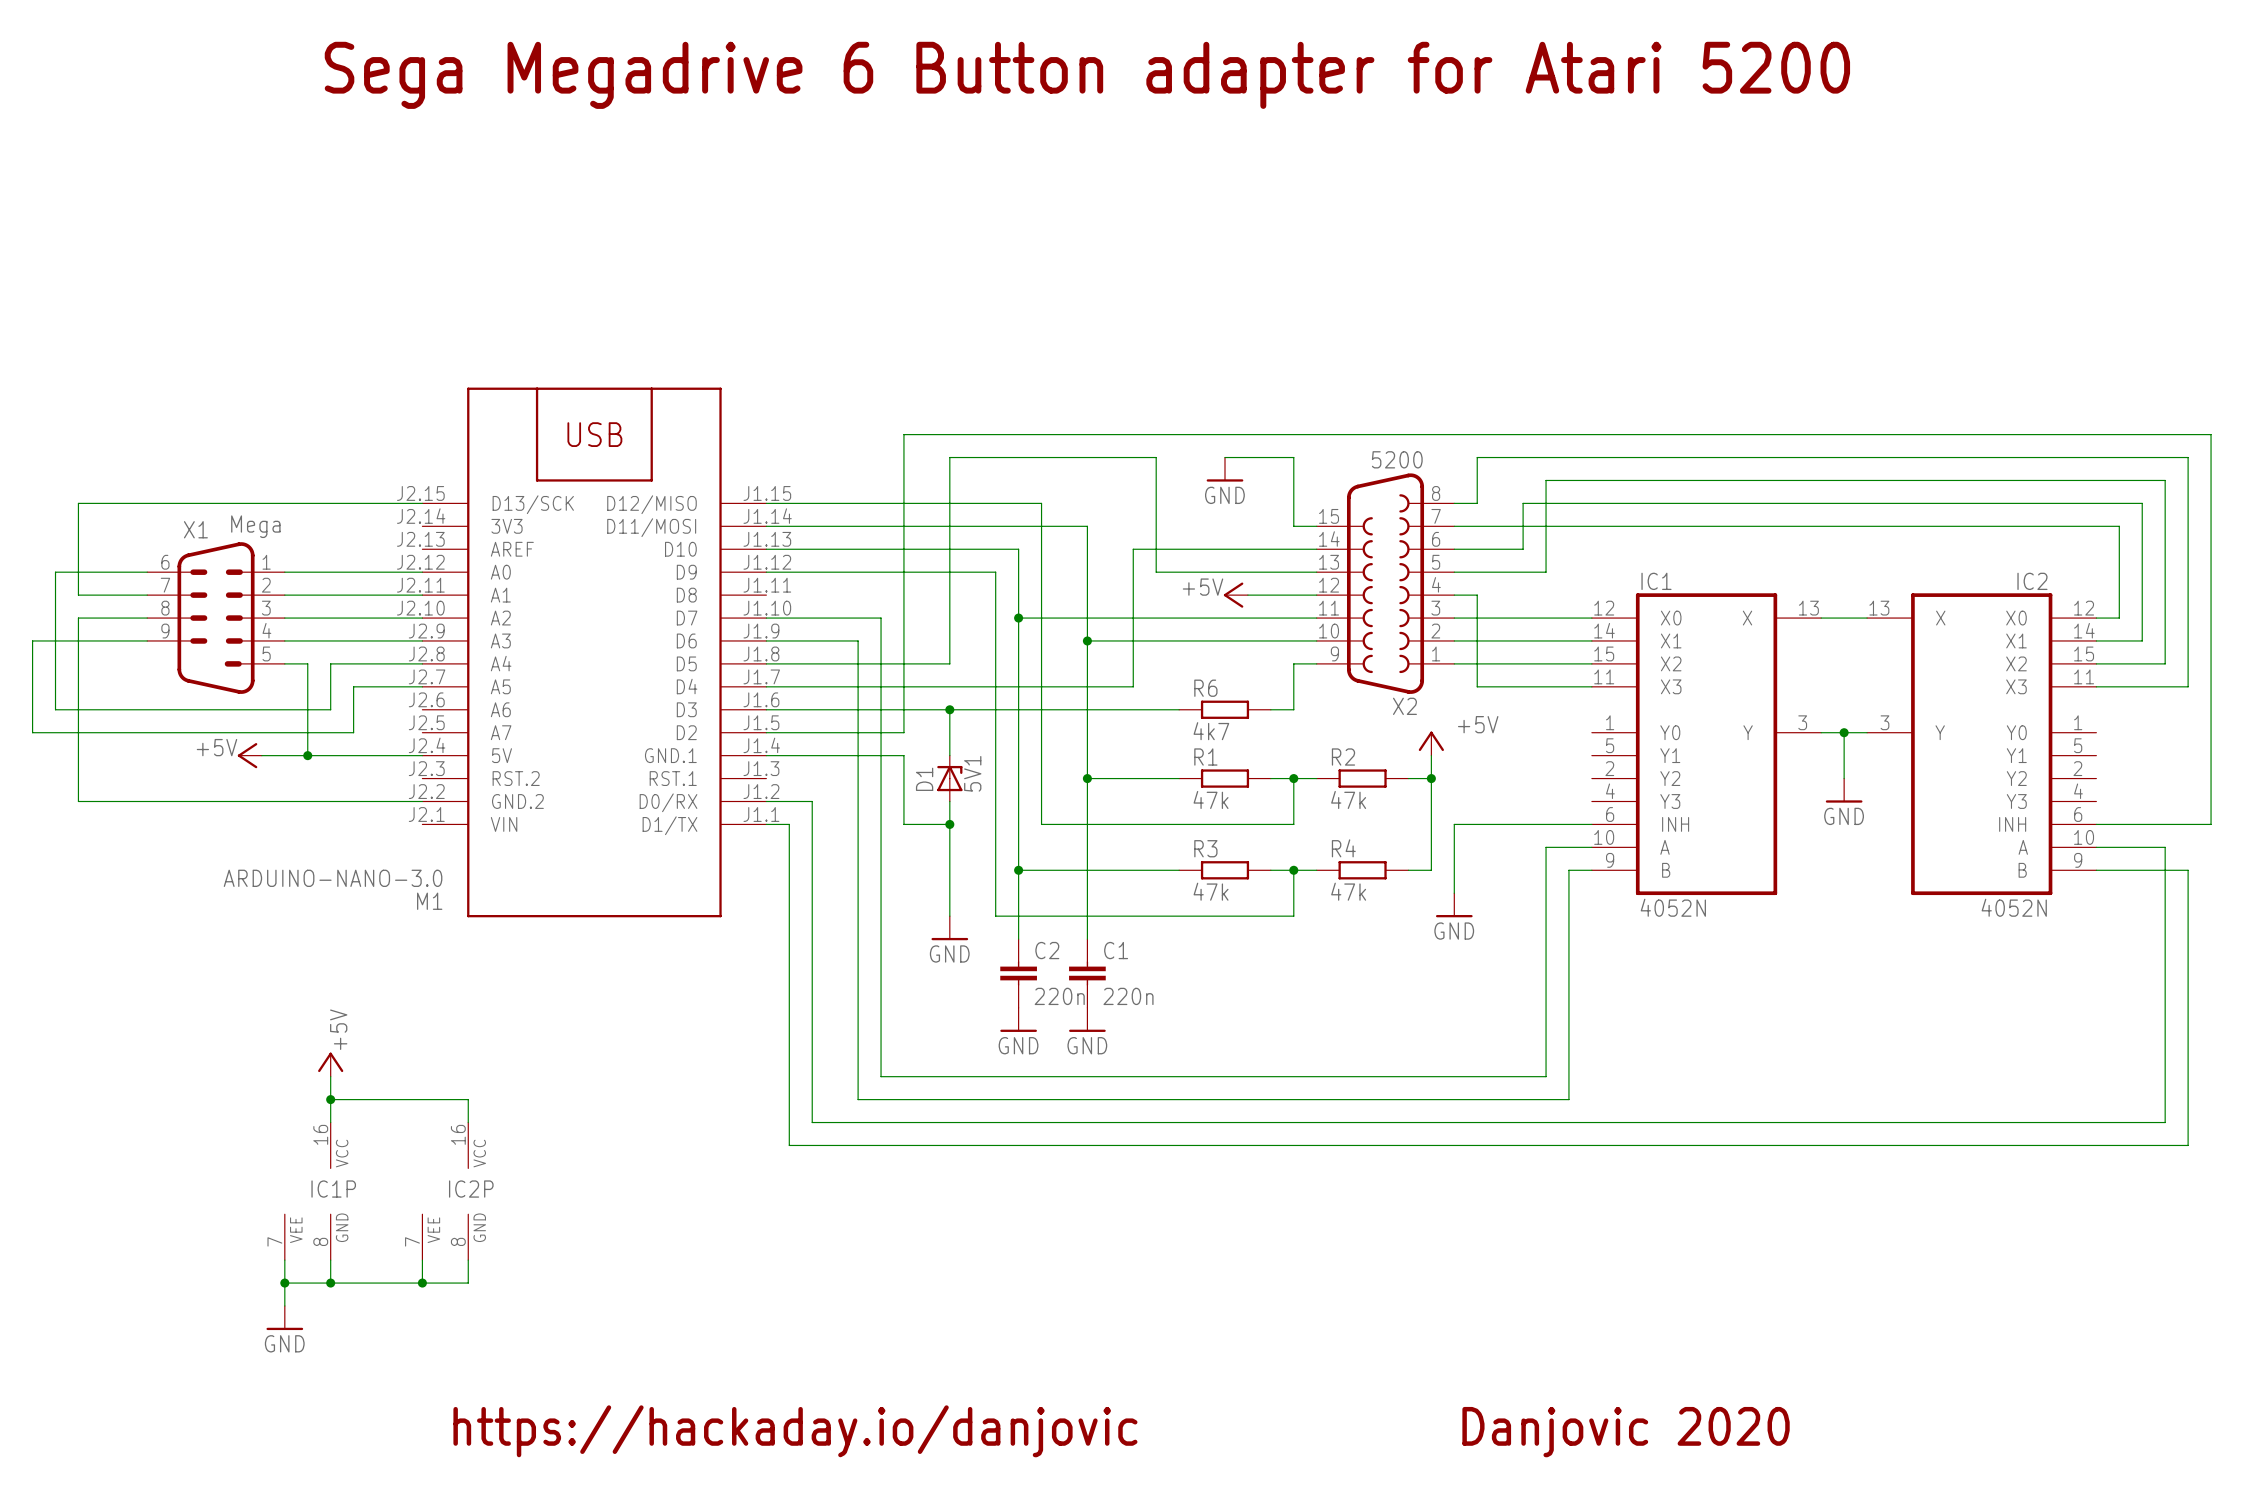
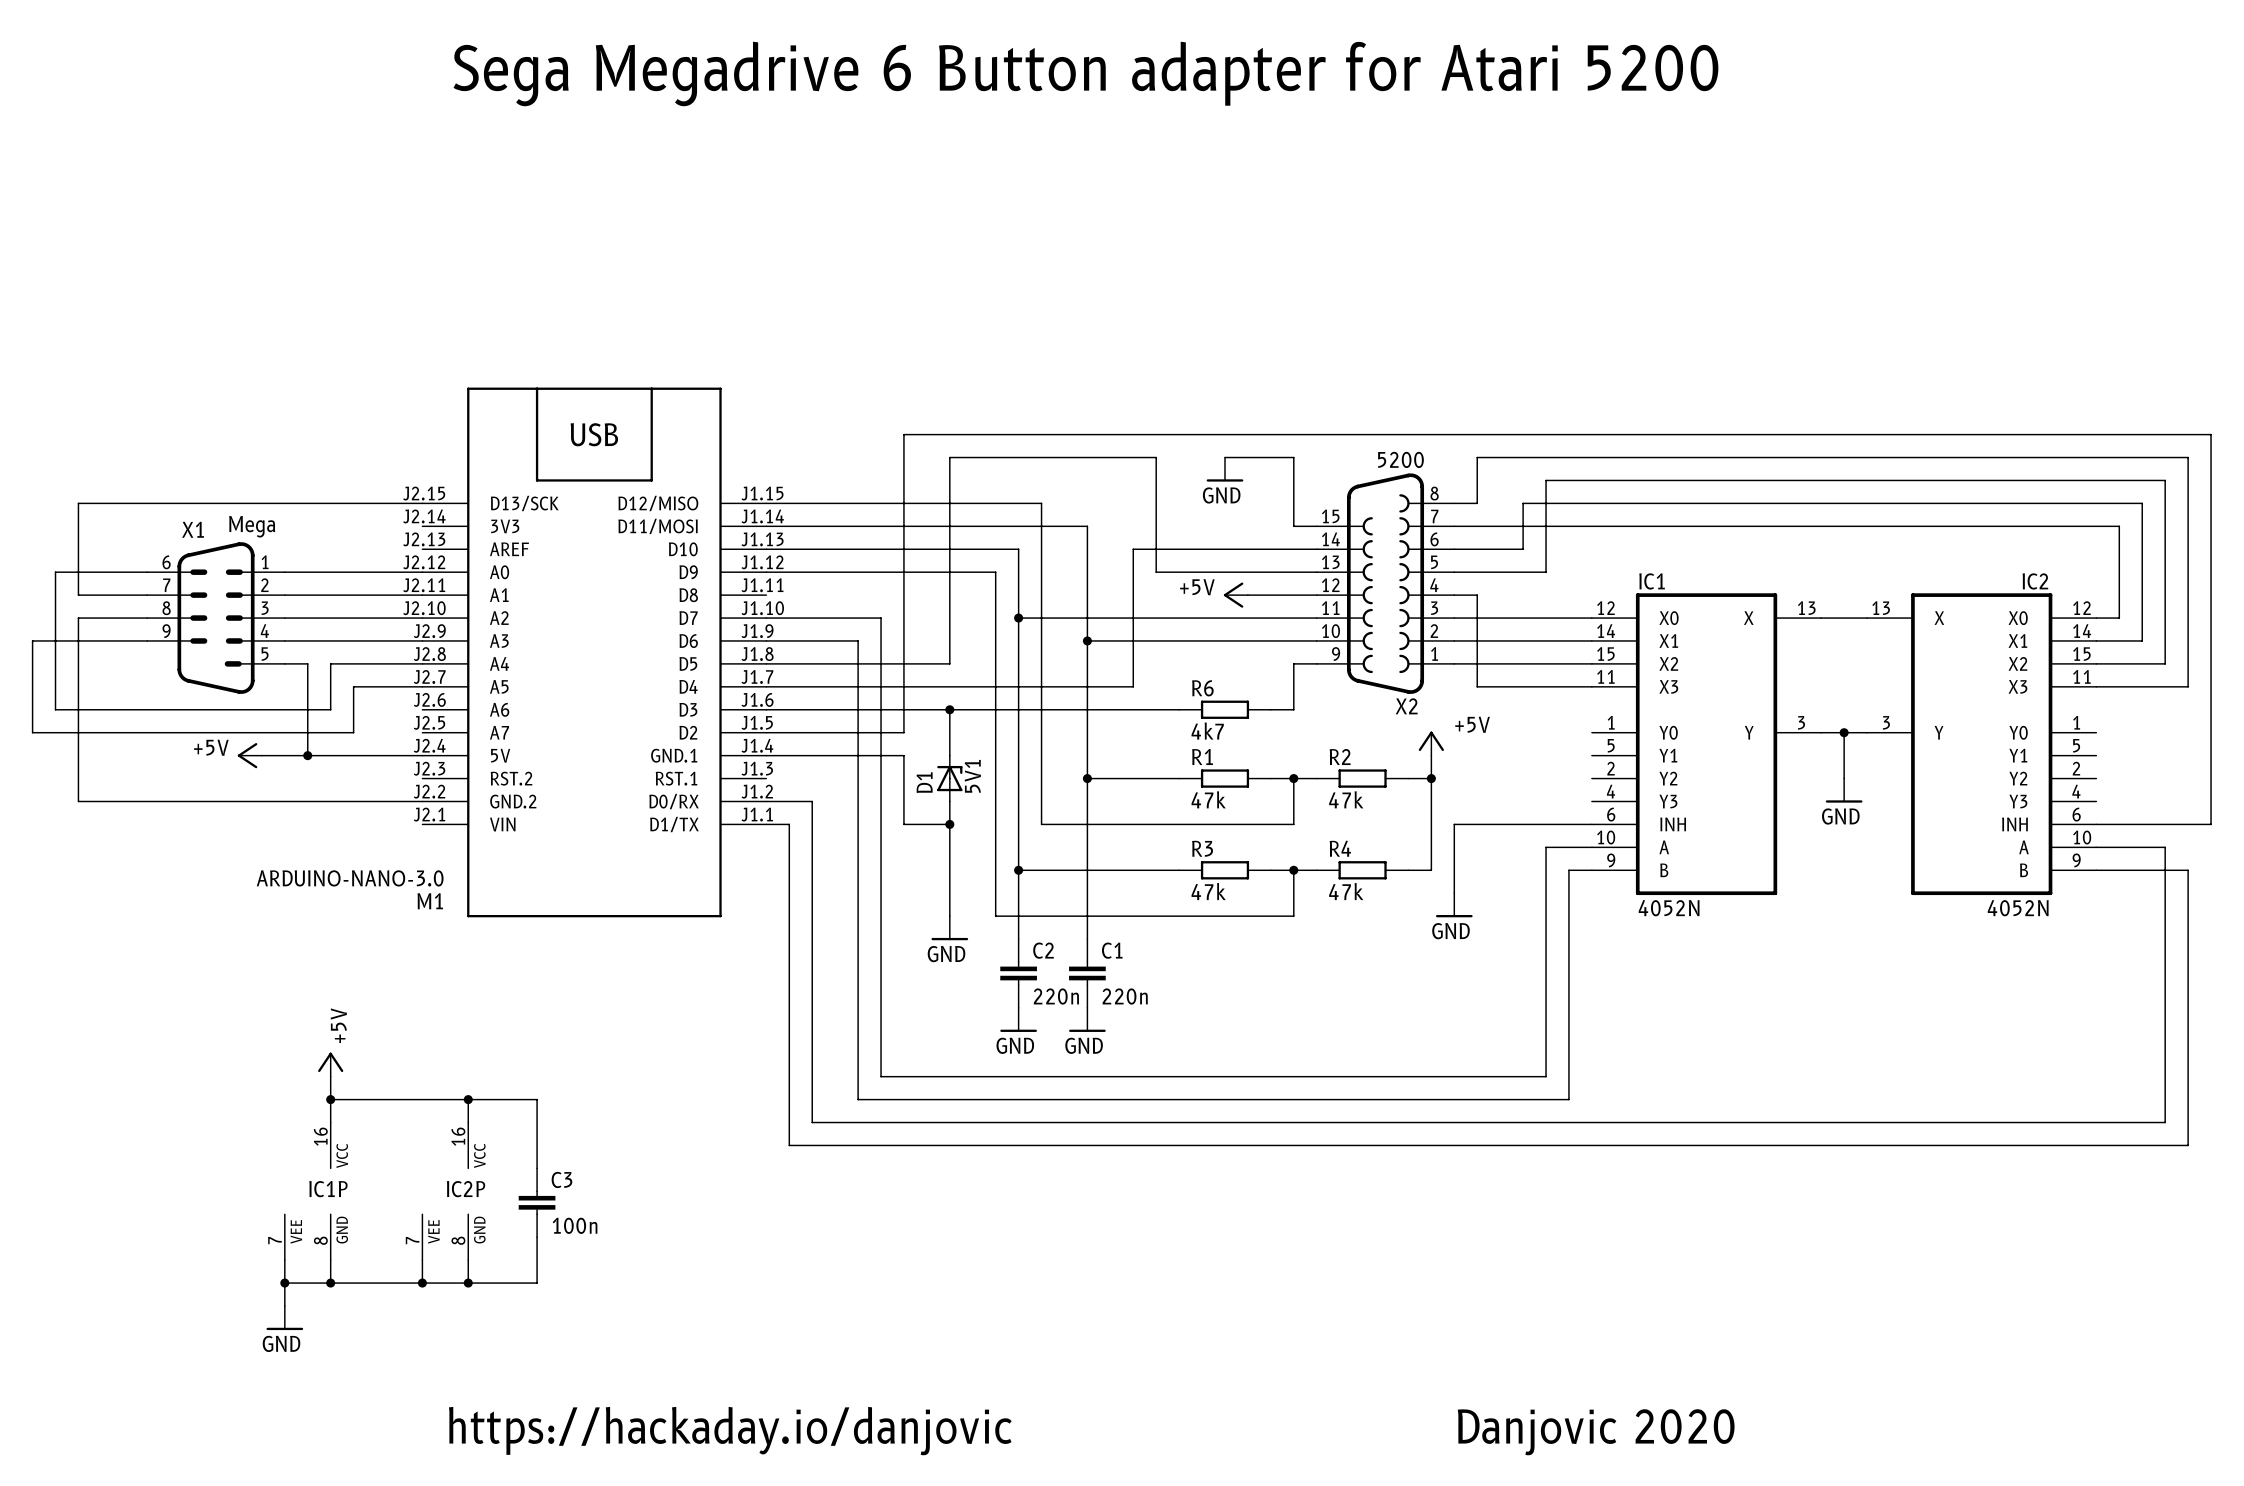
wire: none -> (468, 1099) (537, 1099) (537, 1168)
junction: none -> (468, 1099)
C3: none -> 100n (537, 1202)
wire: none -> (537, 1237) (537, 1283) (468, 1283)
junction: none -> (468, 1283)

